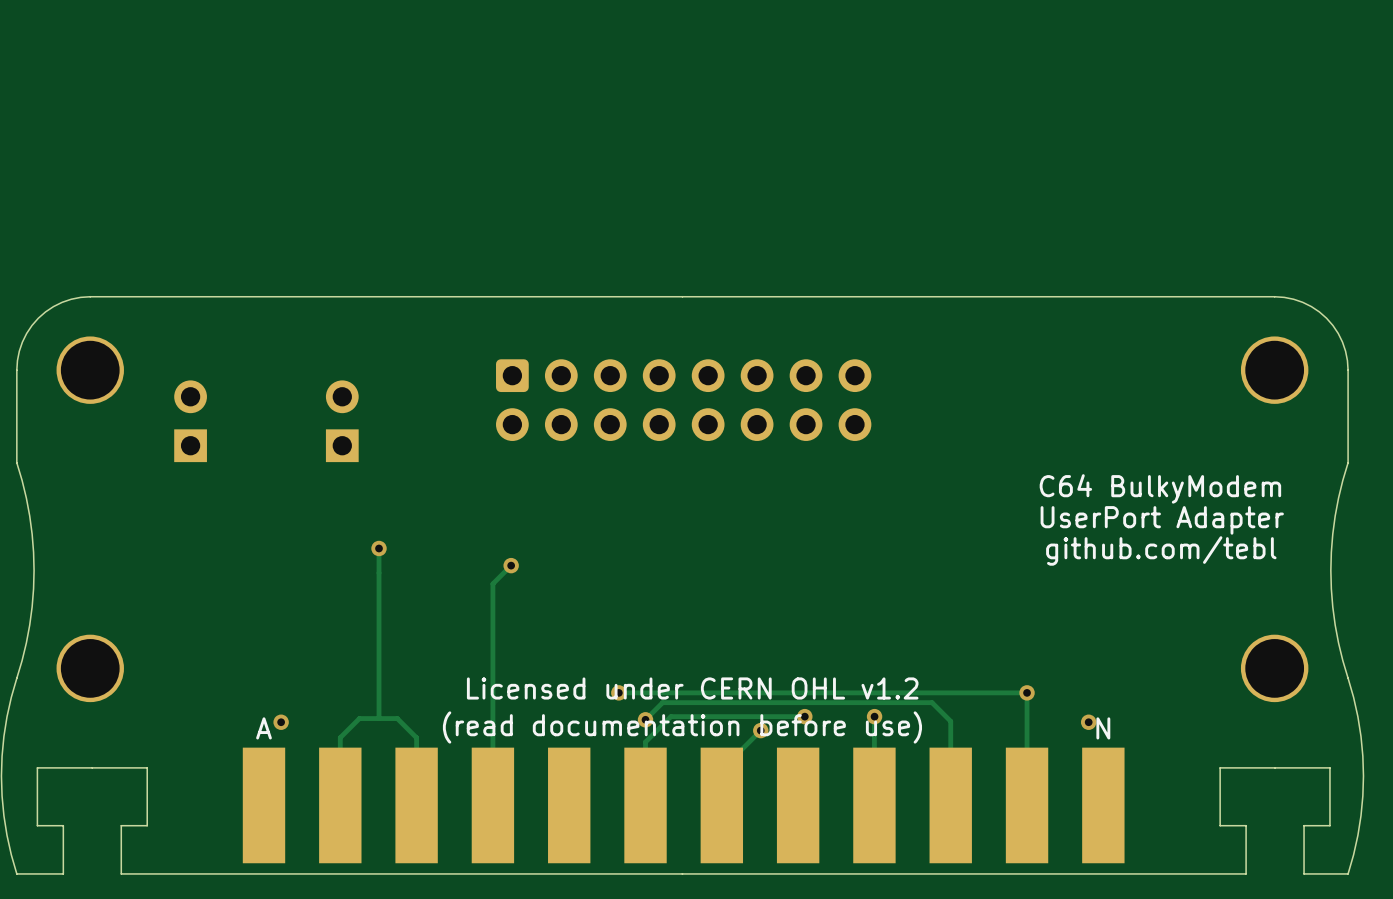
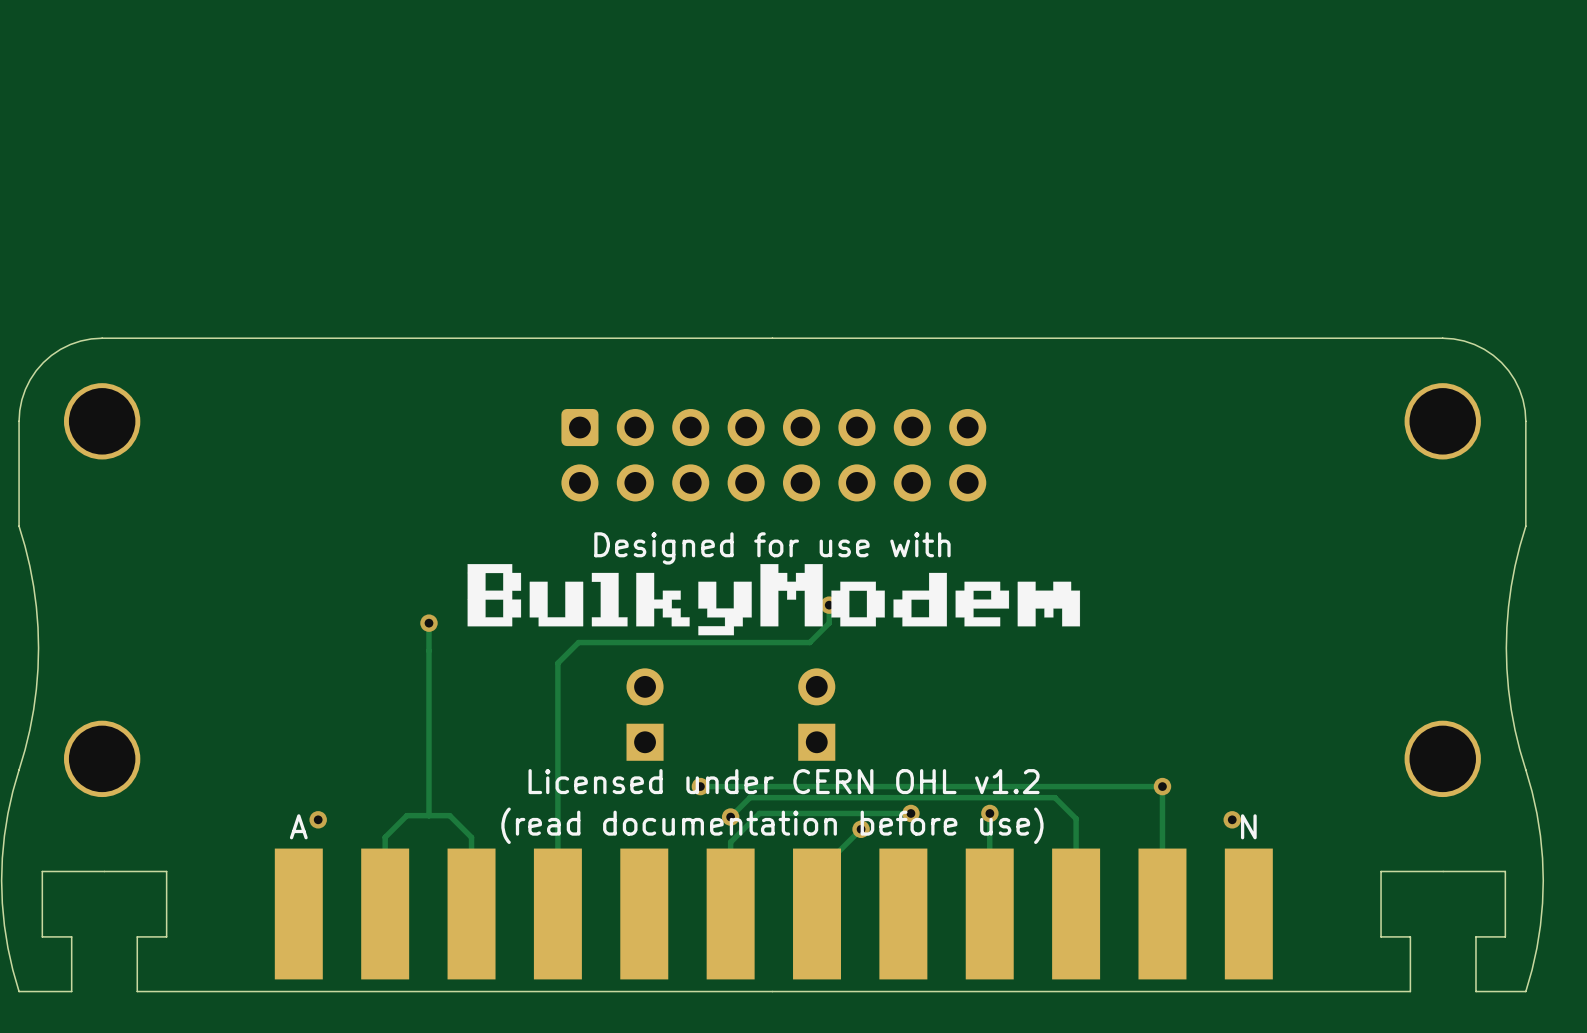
part: (190, 421) -> none
part: (342, 421) -> none
text: none -> Designed for use with (772, 548)
text: C64 BulkyModem (1160, 488) -> none
drawing: none -> [467, 564, 1081, 636]
text: UserPort Adapter (1162, 520) -> none
track: none -> (829, 605) (829, 623) (809, 642) (578, 642)
via: none -> (829, 605)
text: github.com/tebl (1161, 550) -> none
via: (511, 565) -> none
part: none -> (645, 714)
part: none -> (816, 714)

